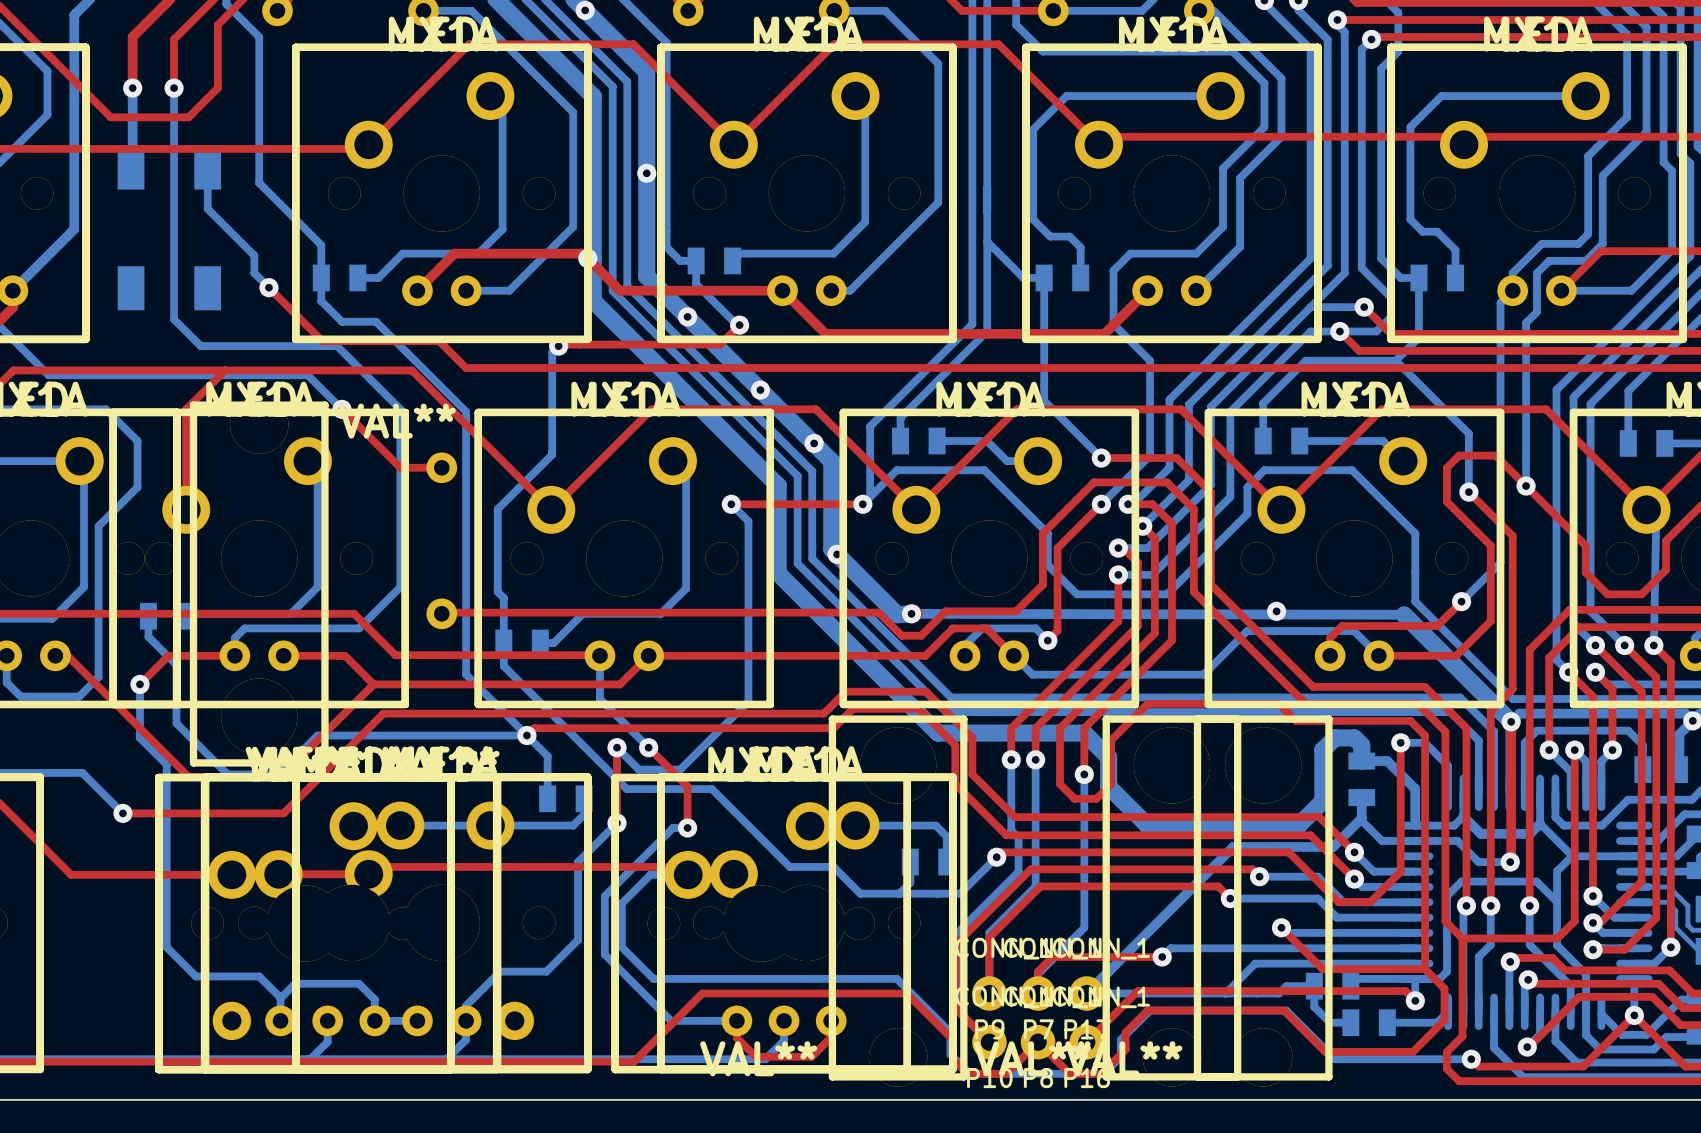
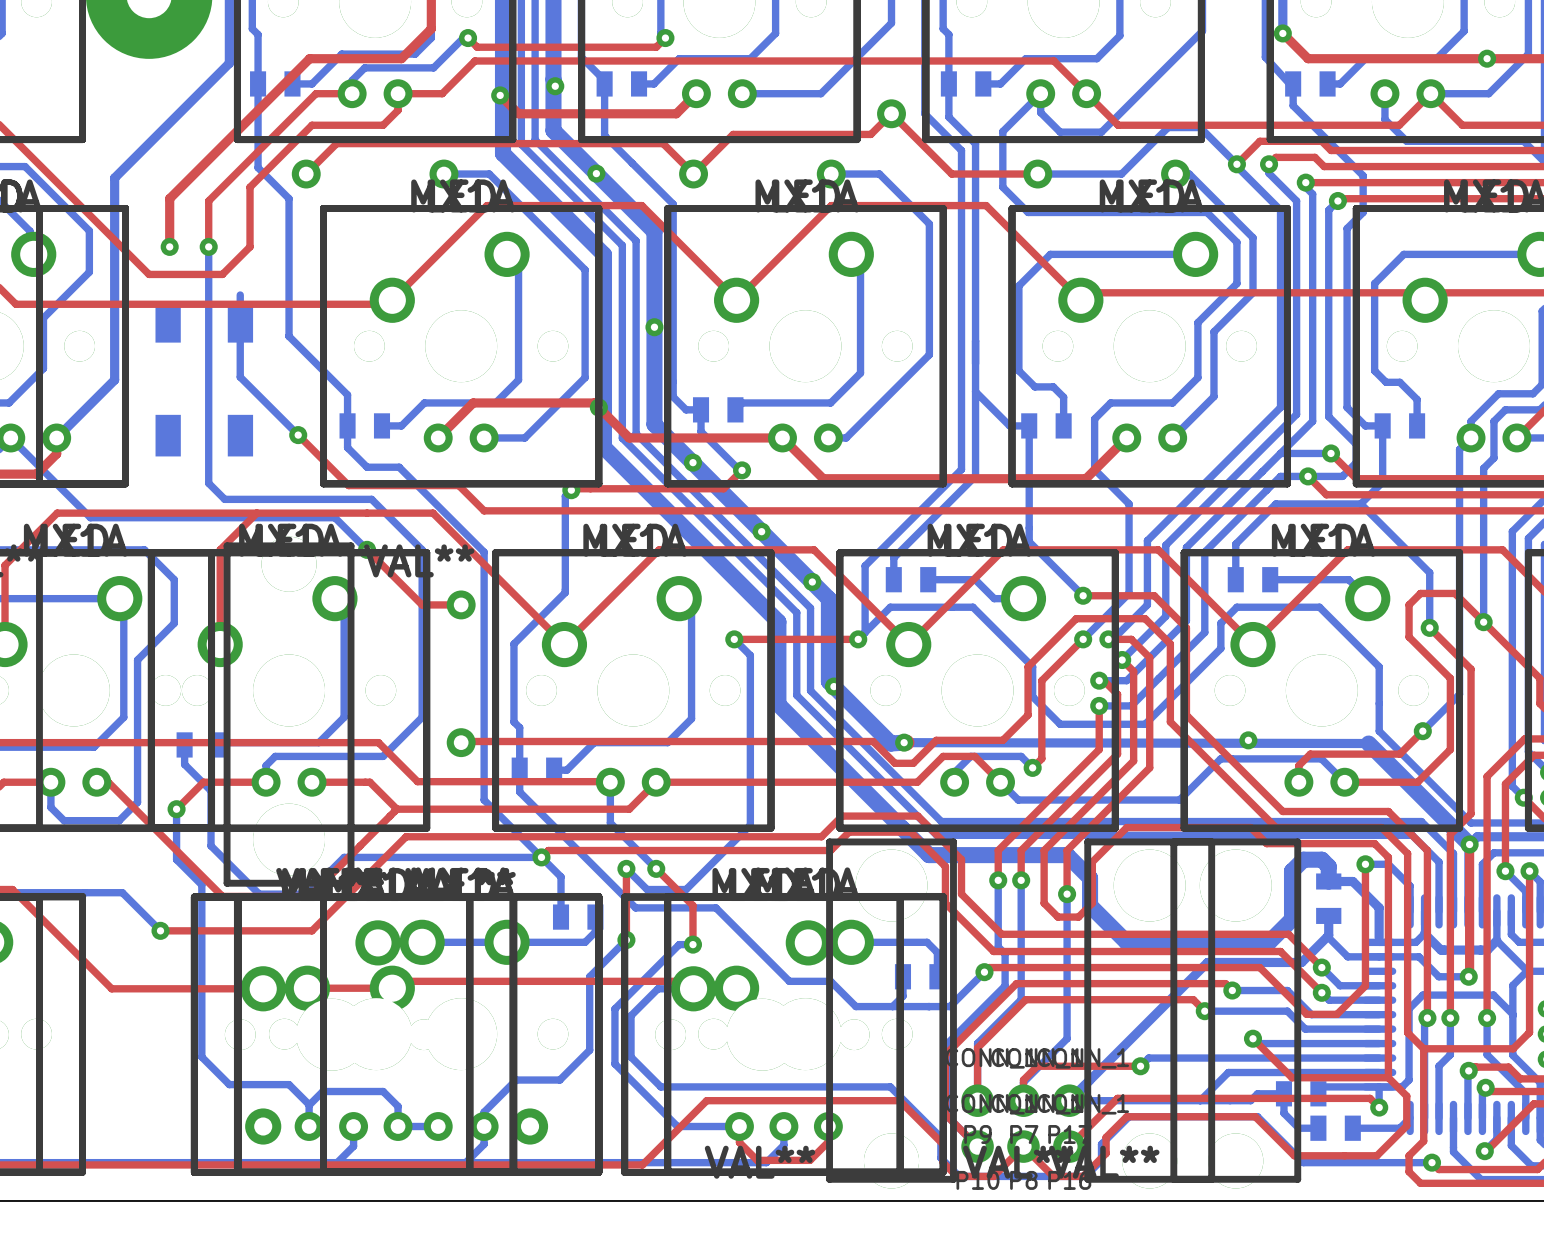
bottom track: (132, 88) (132, 165) (131, 167) -> none
bottom track: (207, 167) (207, 208) (254, 255) (254, 273) -> (240, 295) (240, 377) (284, 421)
bottom track: (174, 319) (200, 346) (337, 346) (346, 355) -> (208, 464) (208, 483) (224, 499) (371, 499)

